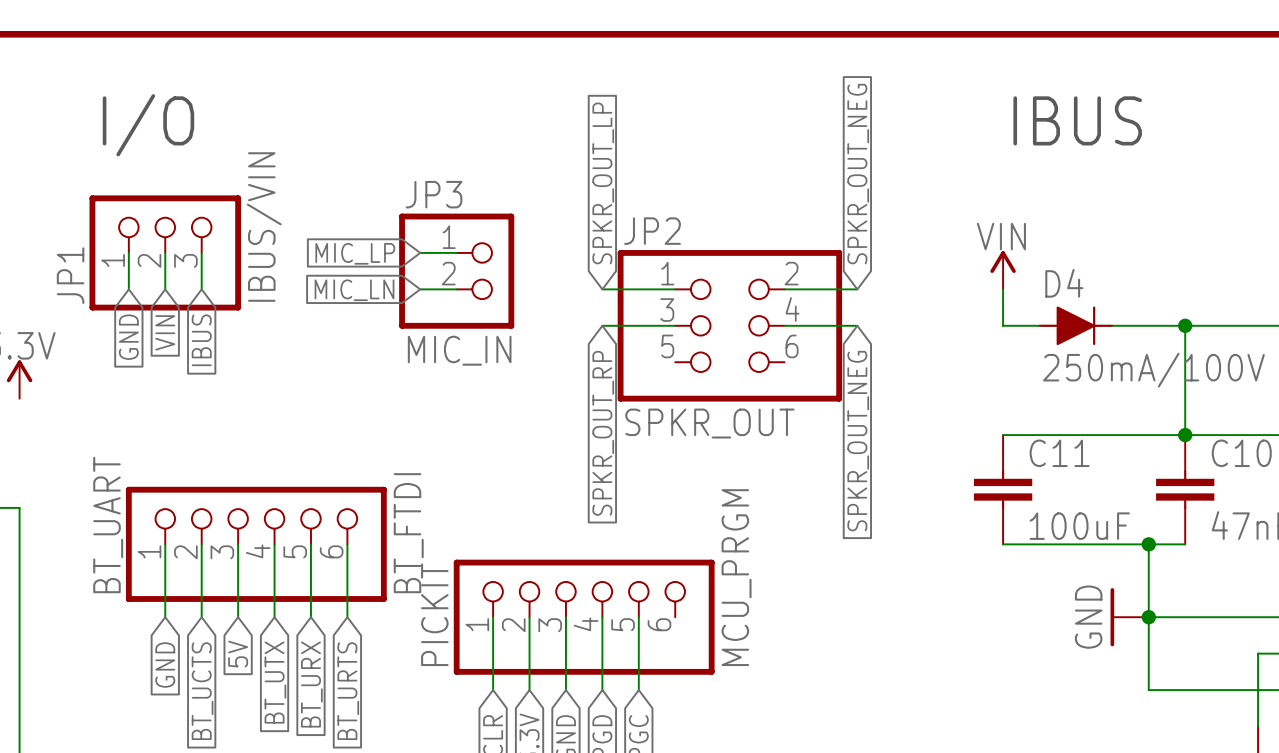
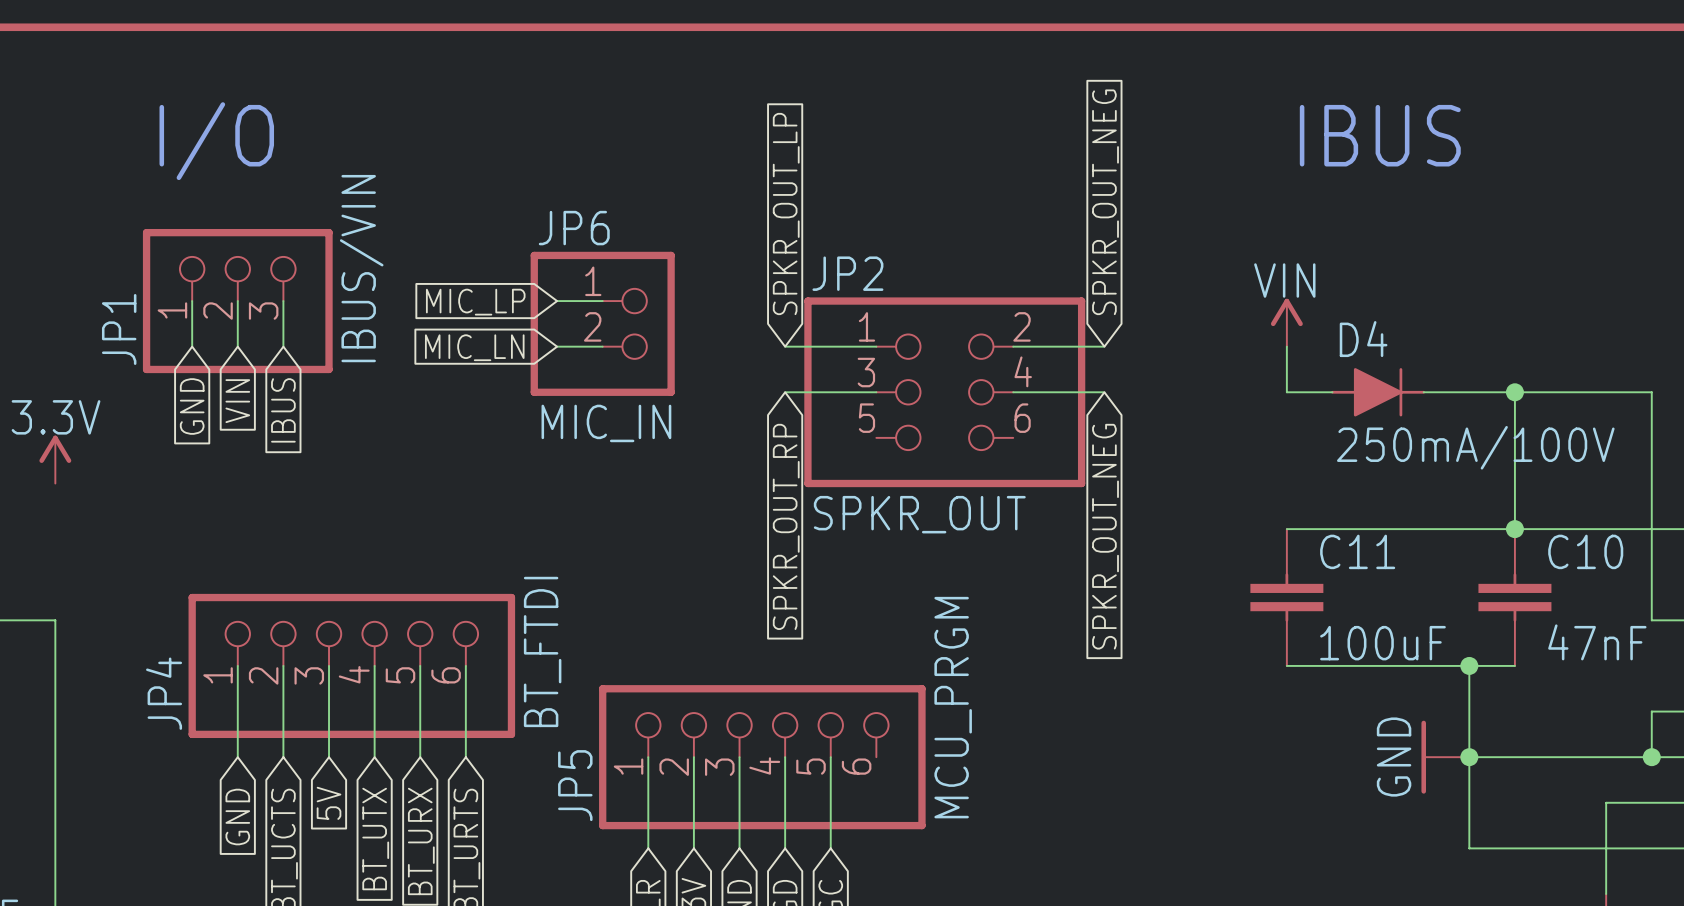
JP3 name: JP3 (433, 194) -> JP6 (574, 228)
BT_UART name: BT_UART (108, 524) -> JP4 (164, 693)
PICKIT name: PICKIT (434, 614) -> JP5 (575, 785)

